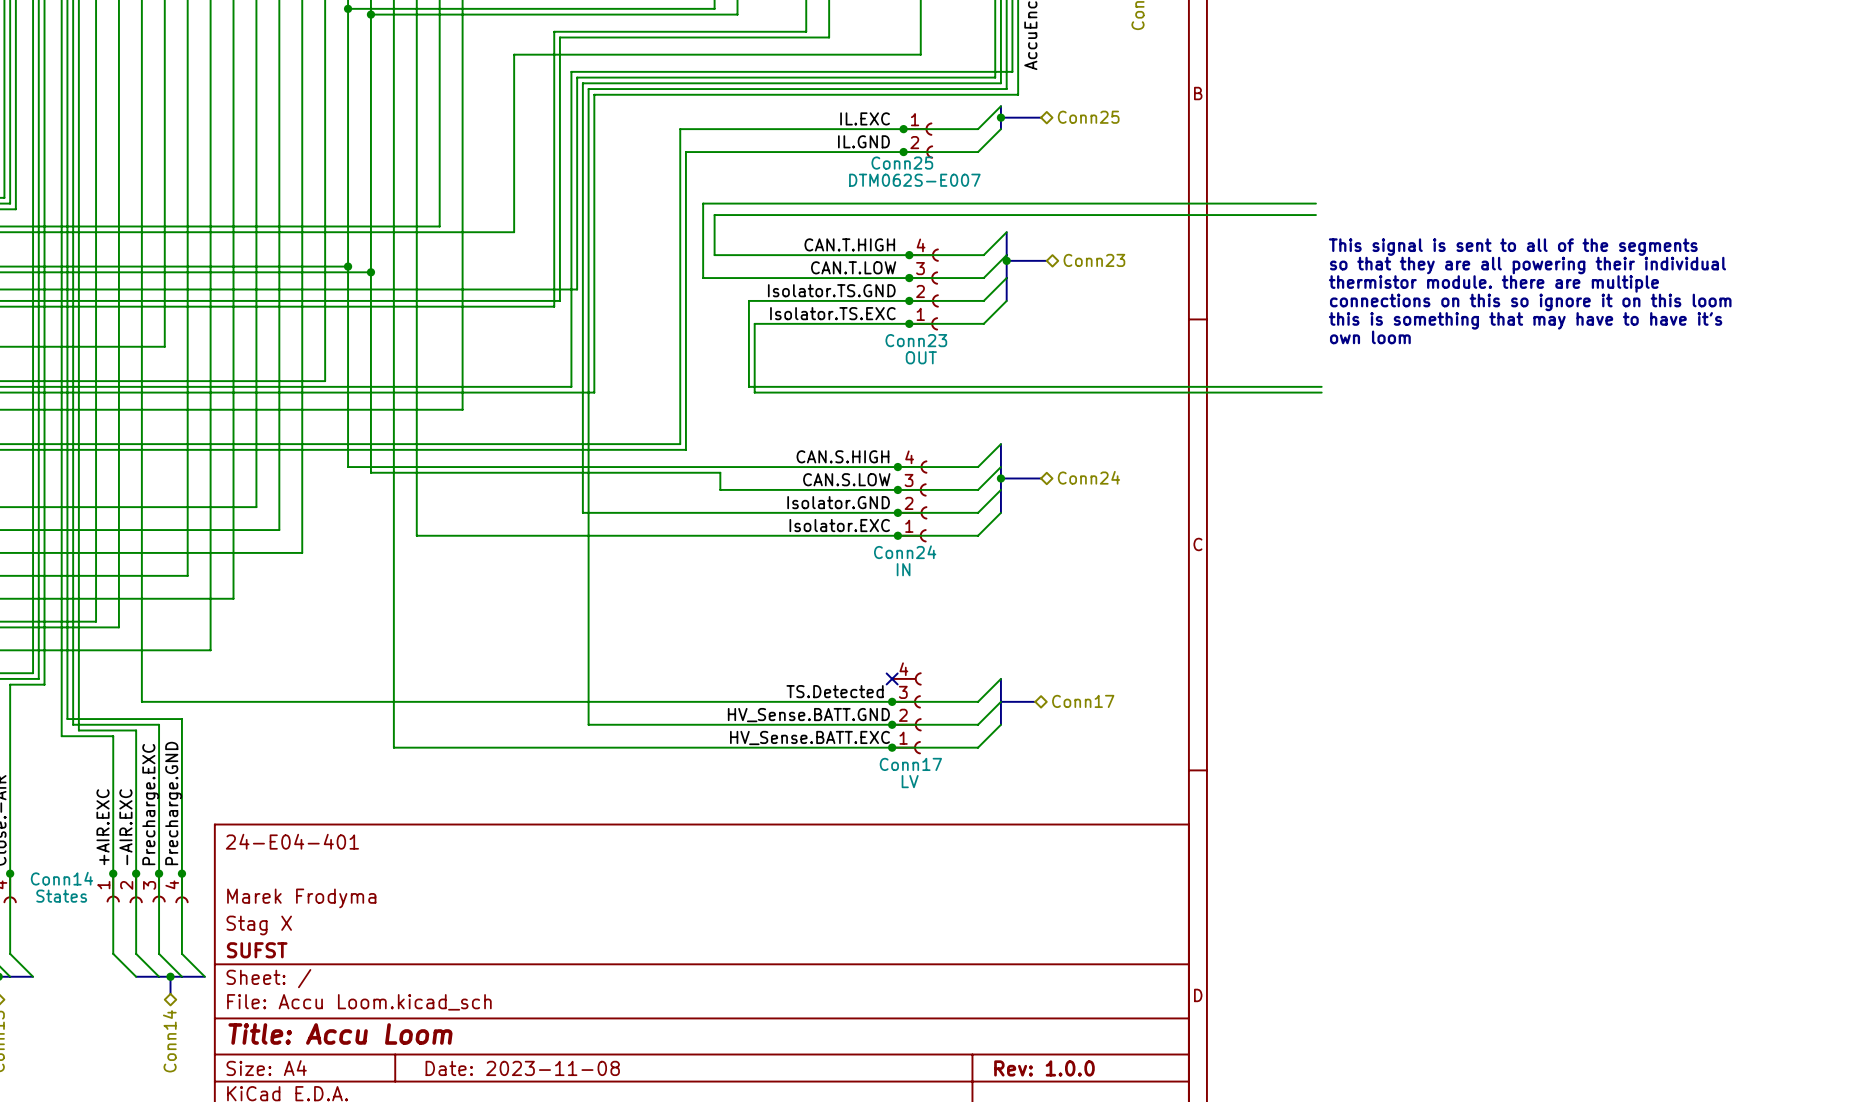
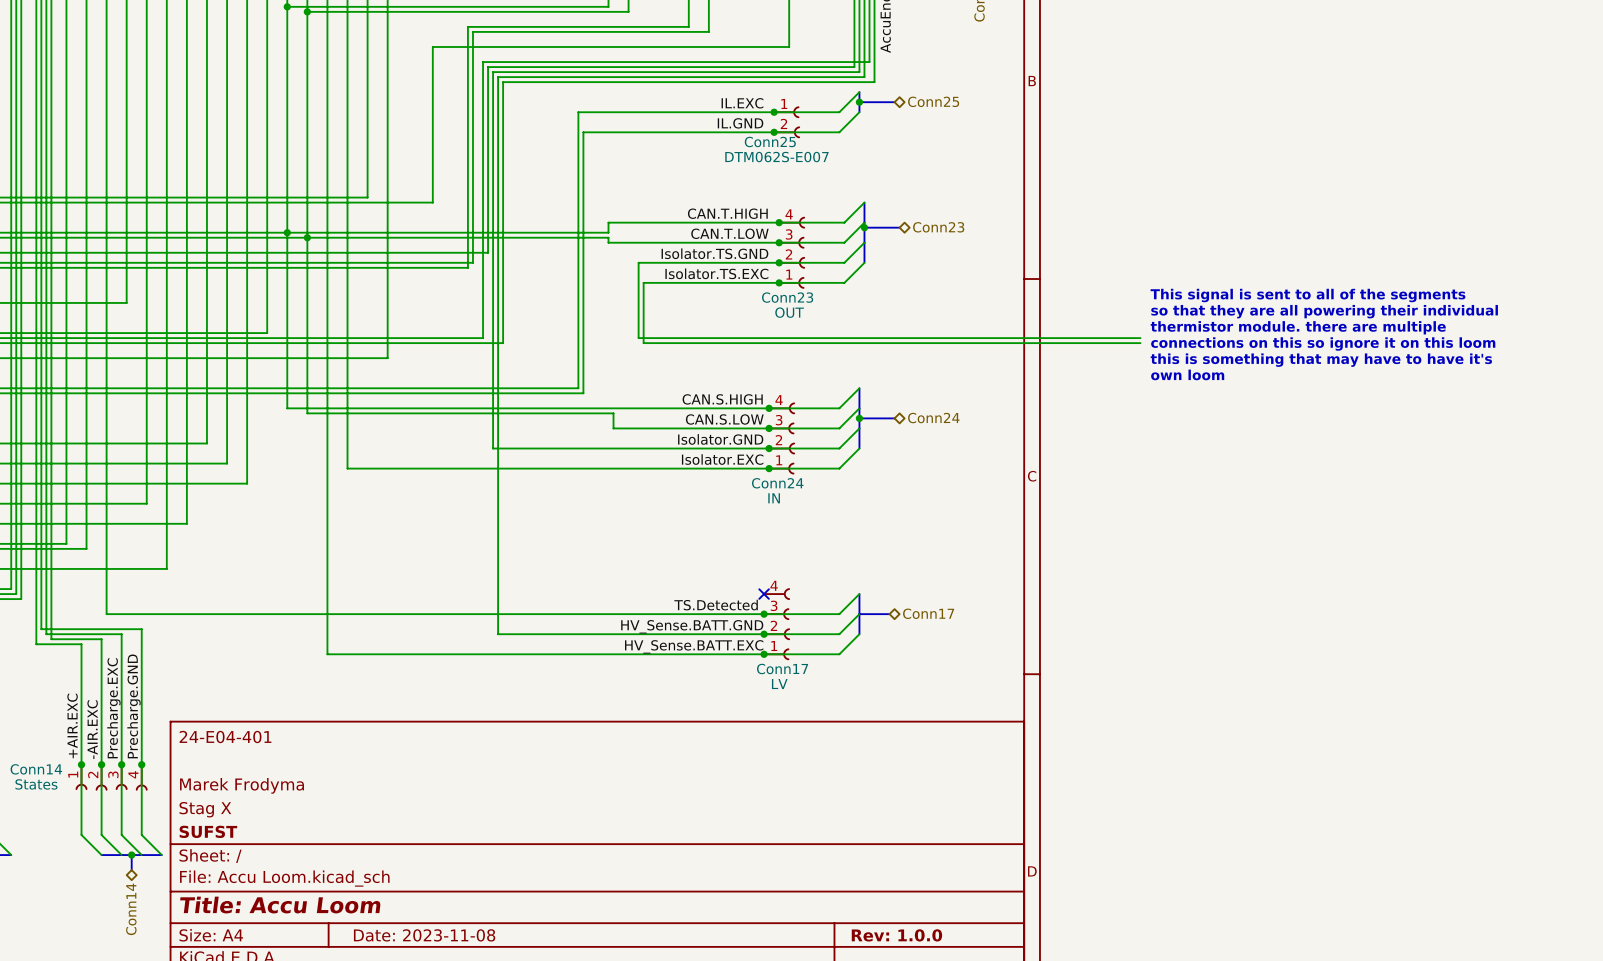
wire: (1315, 203) (703, 203) (703, 278) (714, 278) -> (307, 237) (608, 237) (608, 242)
wire: (1315, 215) (714, 215) (714, 255) -> (287, 232) (608, 232) (608, 222)
text position: This signal is sent to all of the segments (1513, 247) -> This signal is sent to all of the segments (1307, 295)
text position: so that they are all powering their individual (1528, 265) -> so that they are all powering their individual (1324, 311)
text position: thermistor module. there are multiple (1493, 283) -> thermistor module. there are multiple (1298, 327)
text position: connections on this so ignore it on this loom (1530, 302) -> connections on this so ignore it on this loom (1323, 343)
text position: this is something that may have to have it's (1525, 320) -> this is something that may have to have it's (1321, 360)
text position: own loom (1370, 337) -> own loom (1187, 374)

